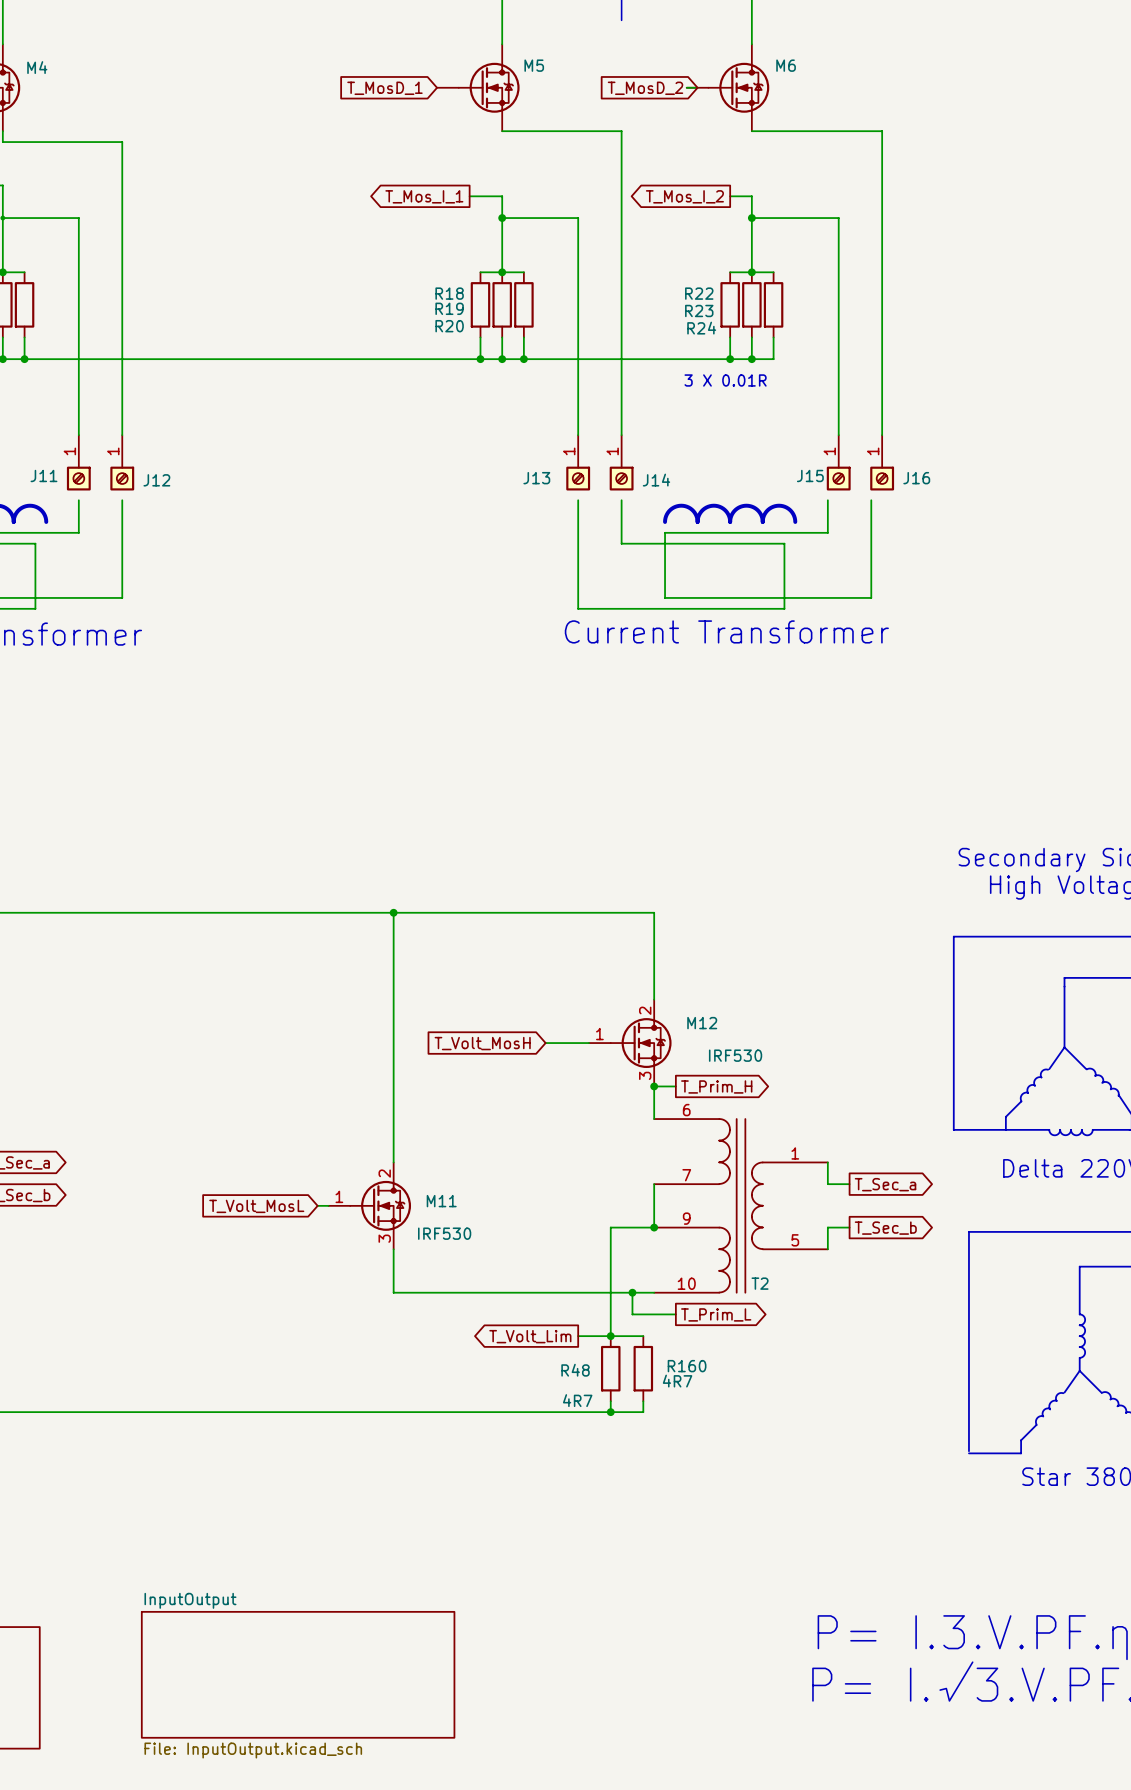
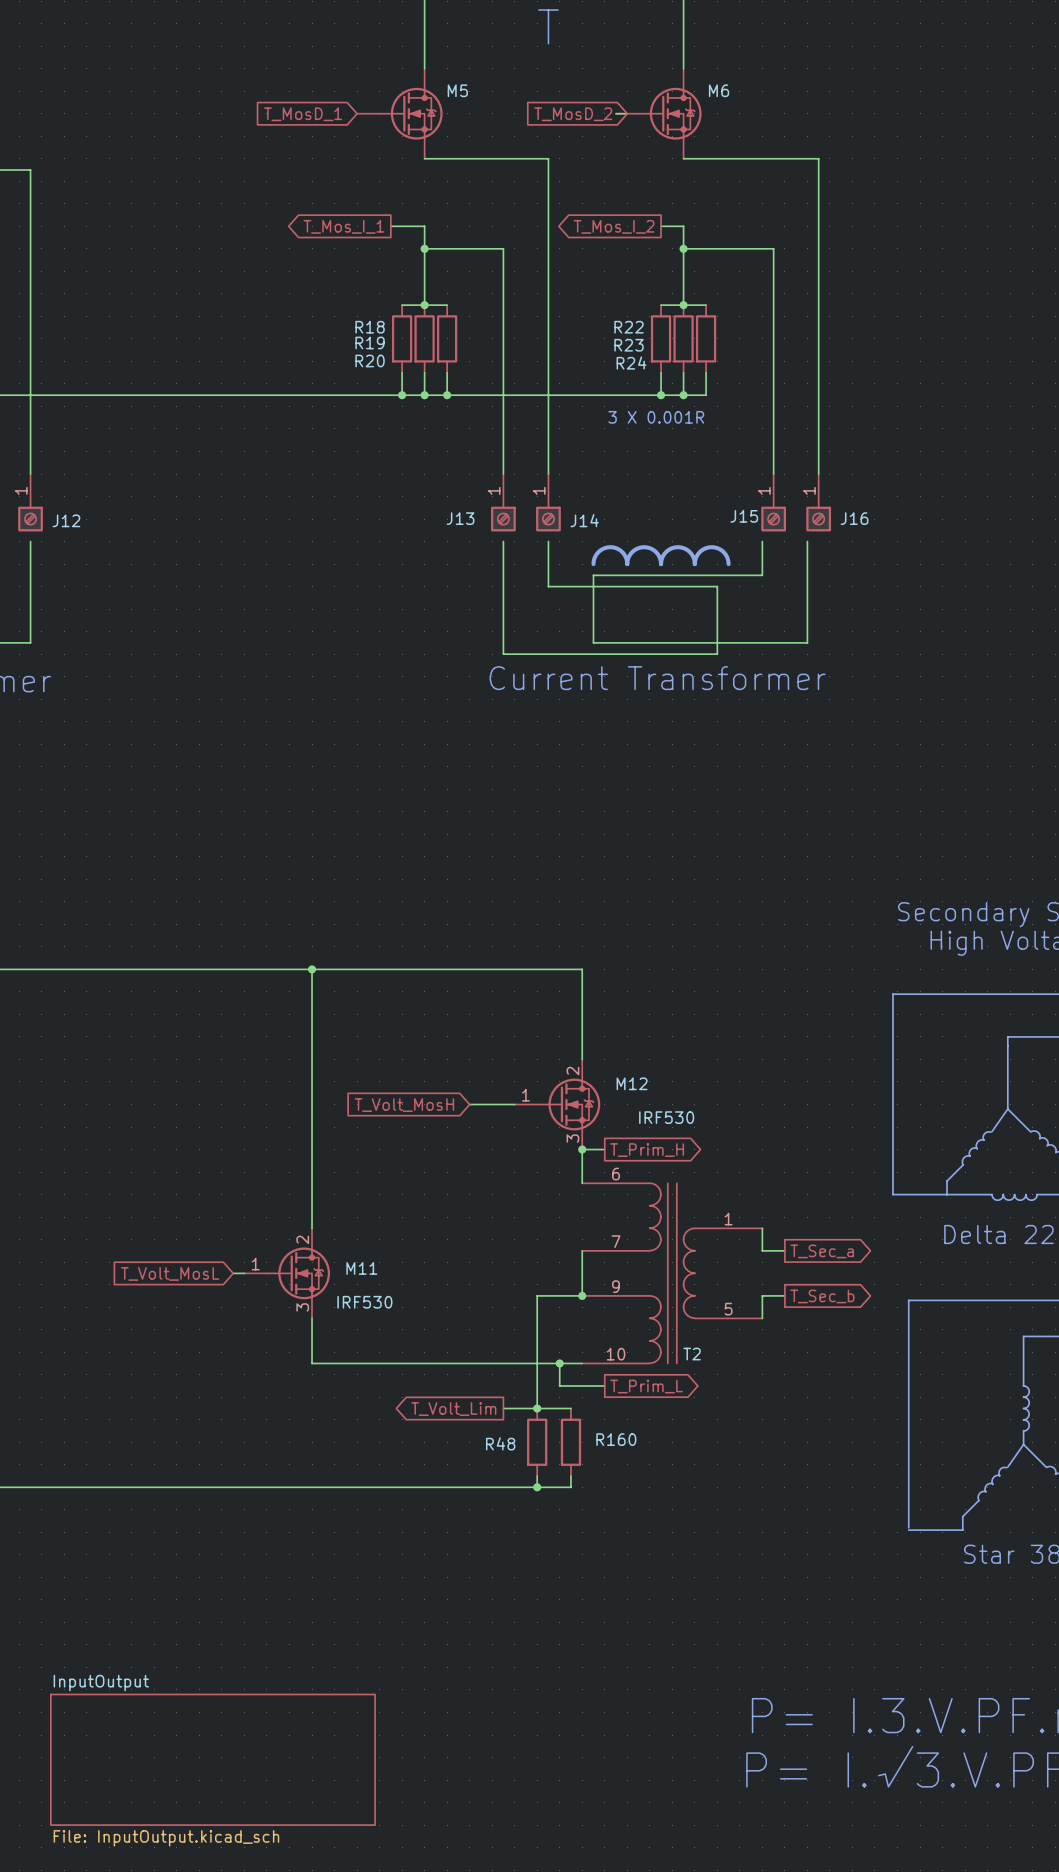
text: 3 X 0.01R (725, 380) -> 3 X 0.001R (656, 417)
R160 value: 4R7 (677, 1381) -> none
R48 value: 4R7 (577, 1400) -> none

